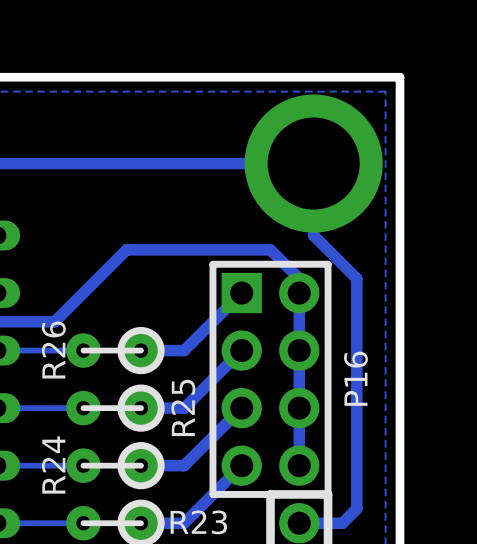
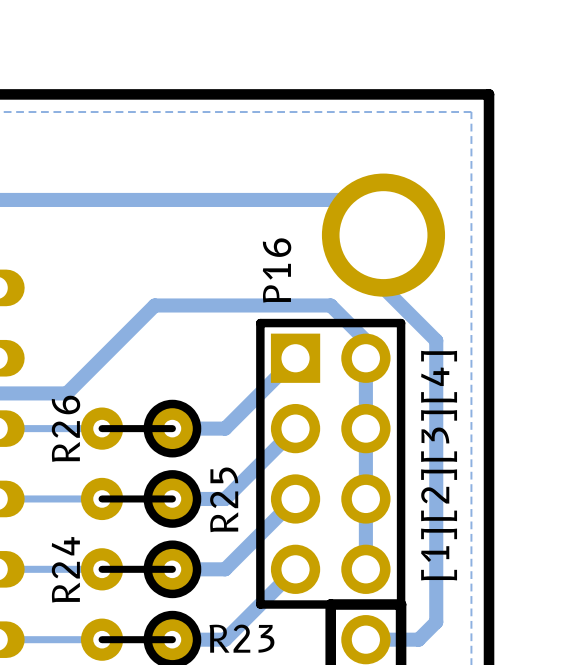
part: (313, 163) -> none
part: none -> (383, 235)
P16 name position: P16 (355, 378) -> P16 (277, 270)
text: none -> [1][2][3][4] (439, 465)

